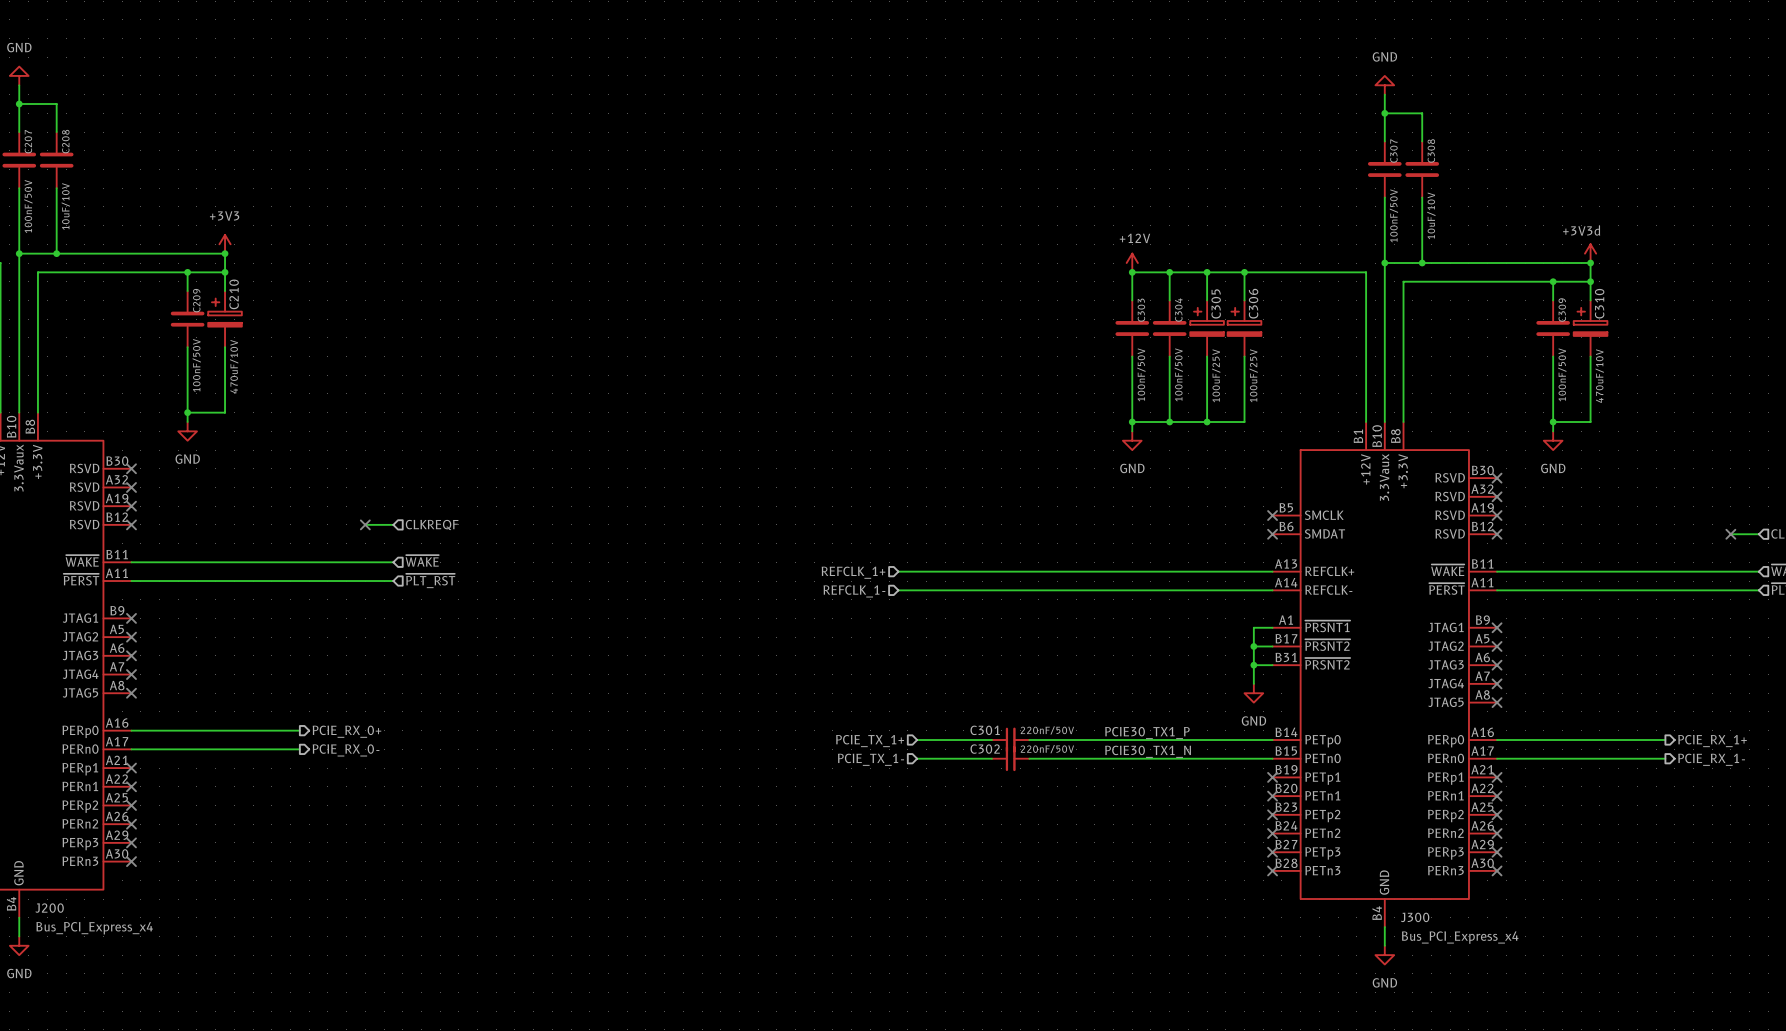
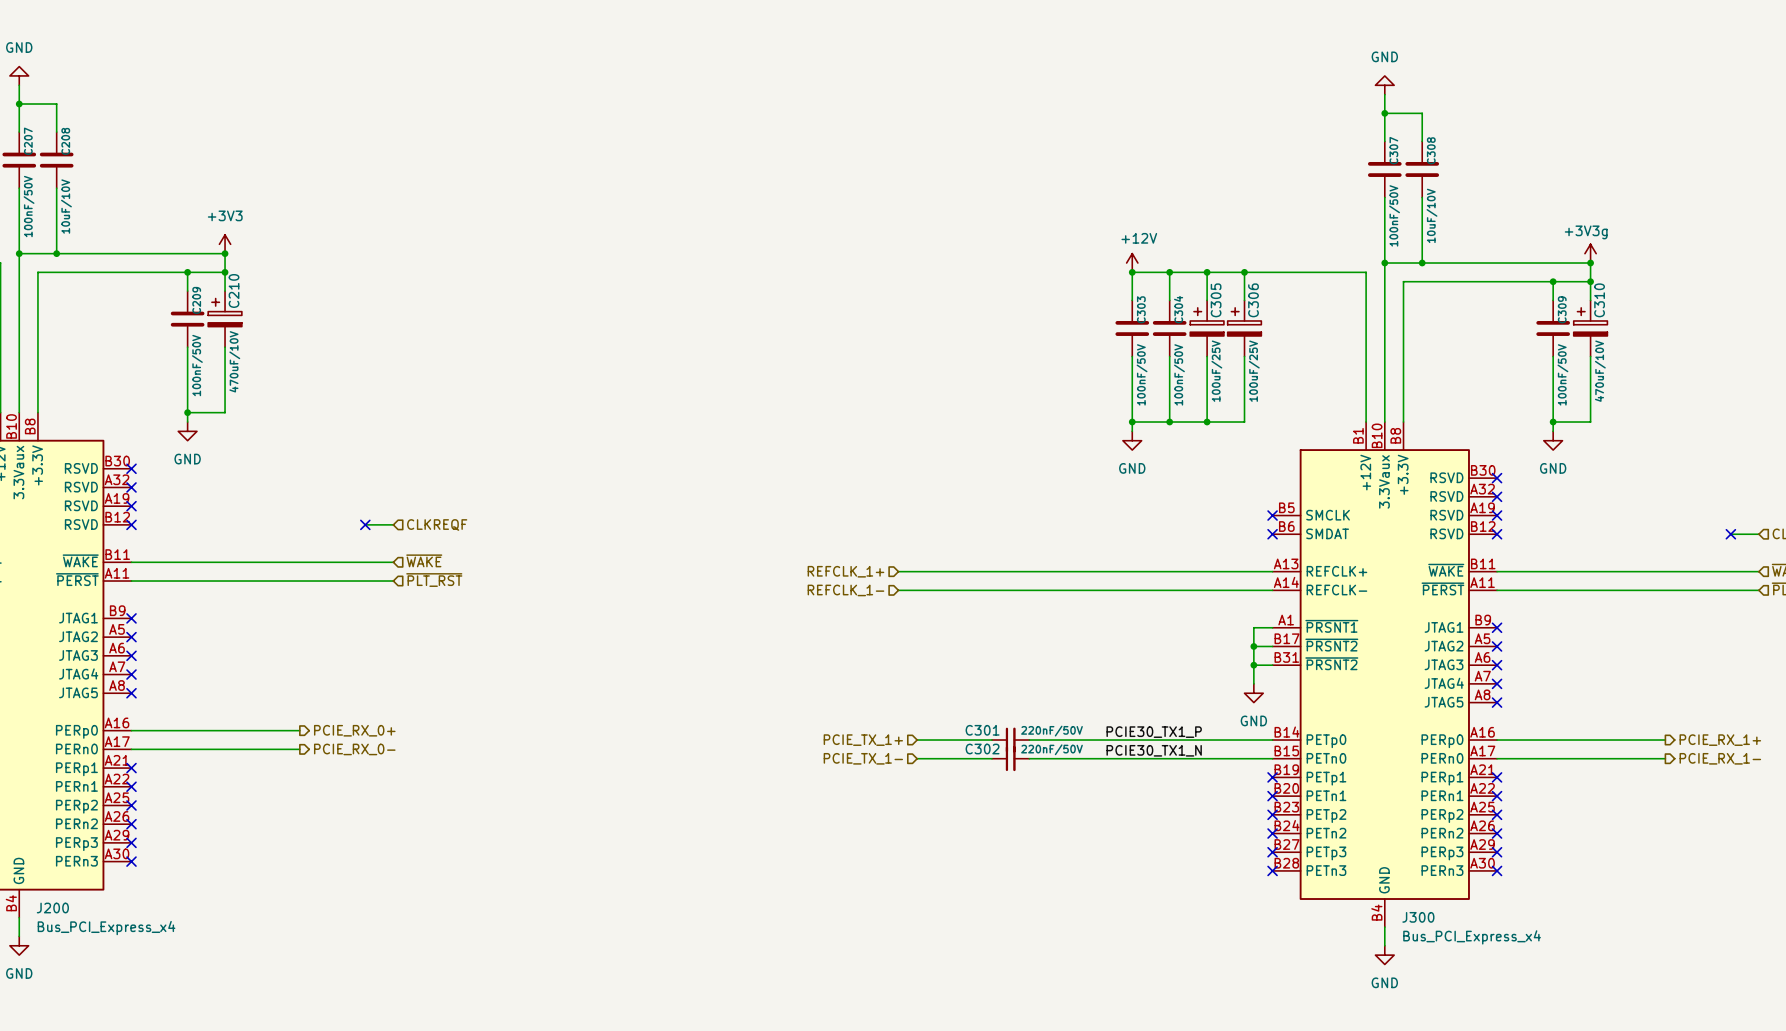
power symbol: +3V3d (1590, 253) -> +3V3g (1590, 253)

